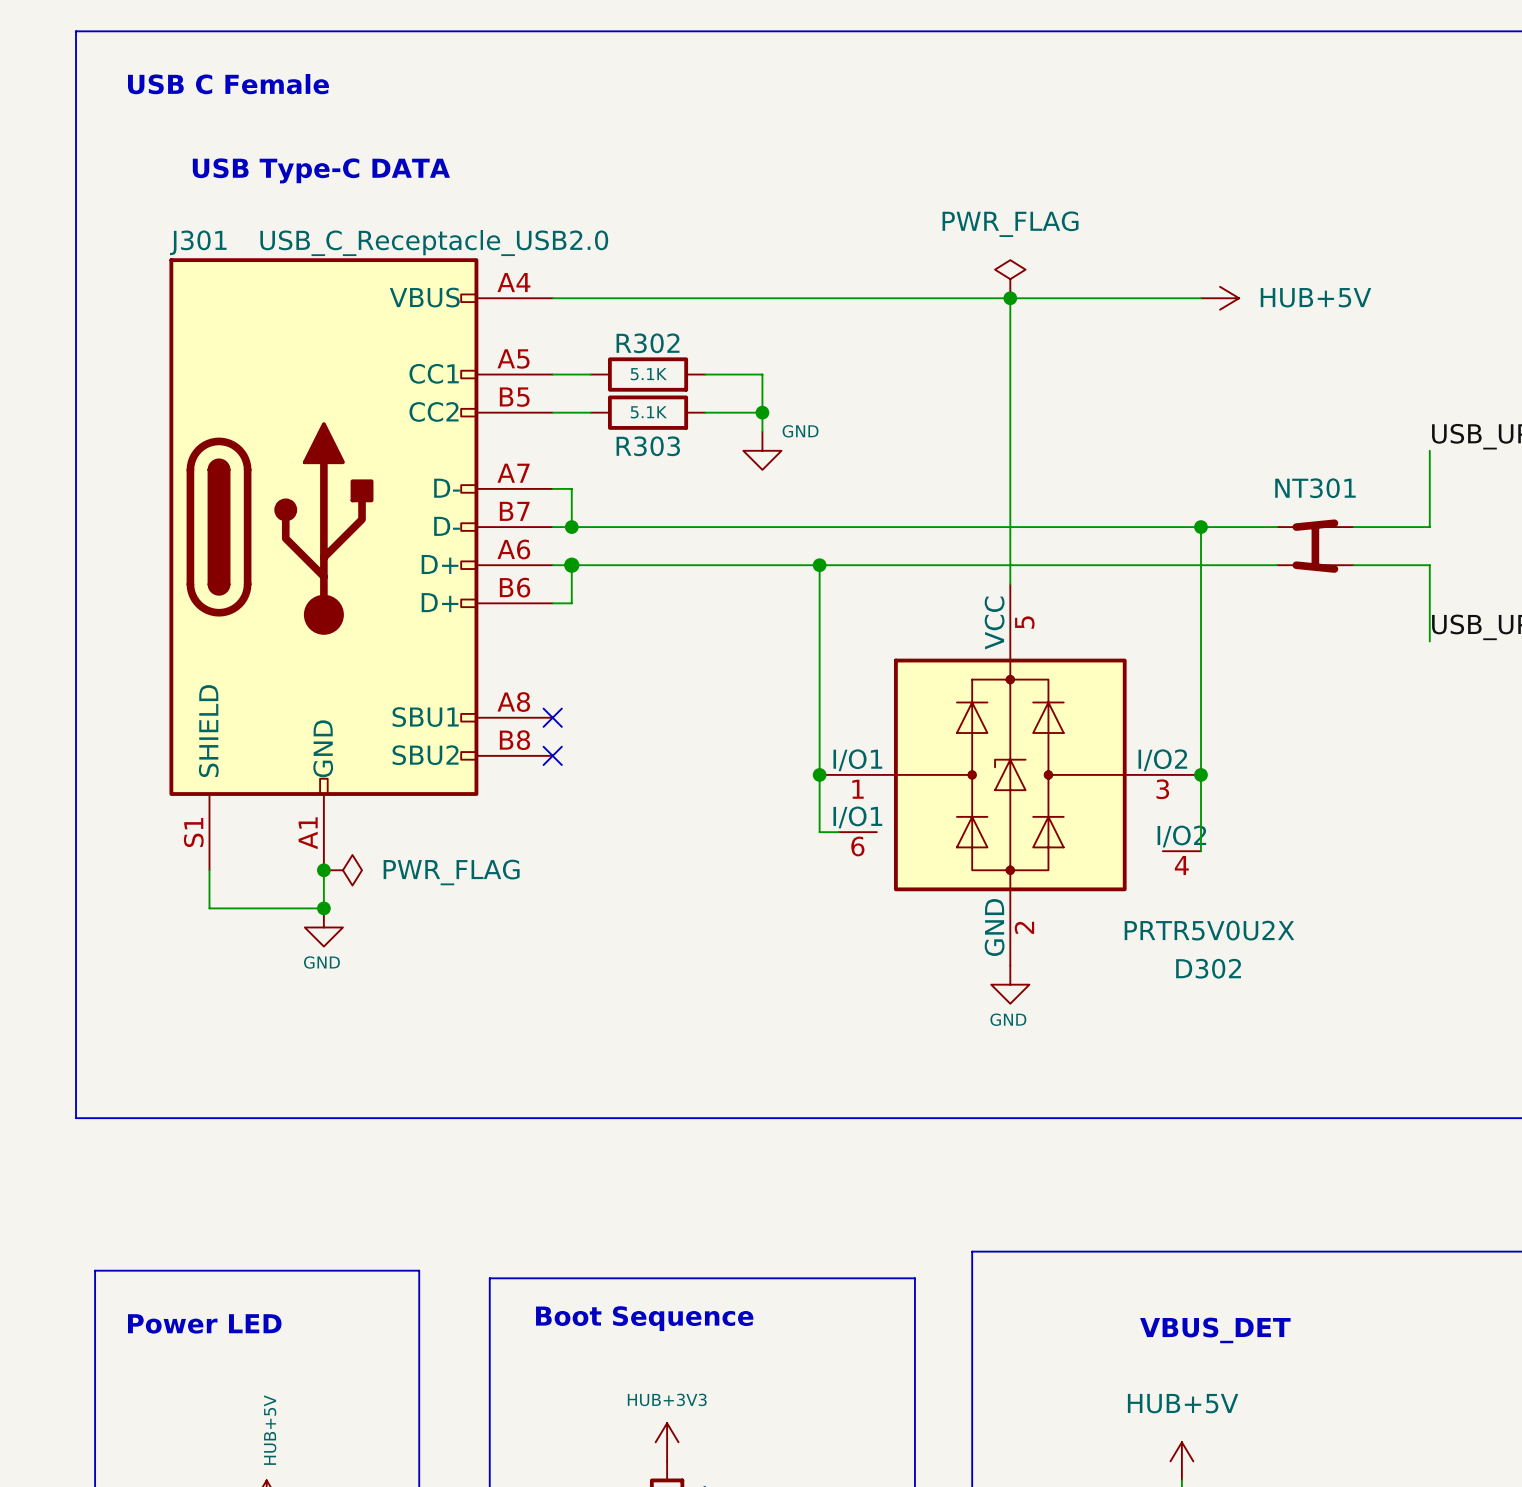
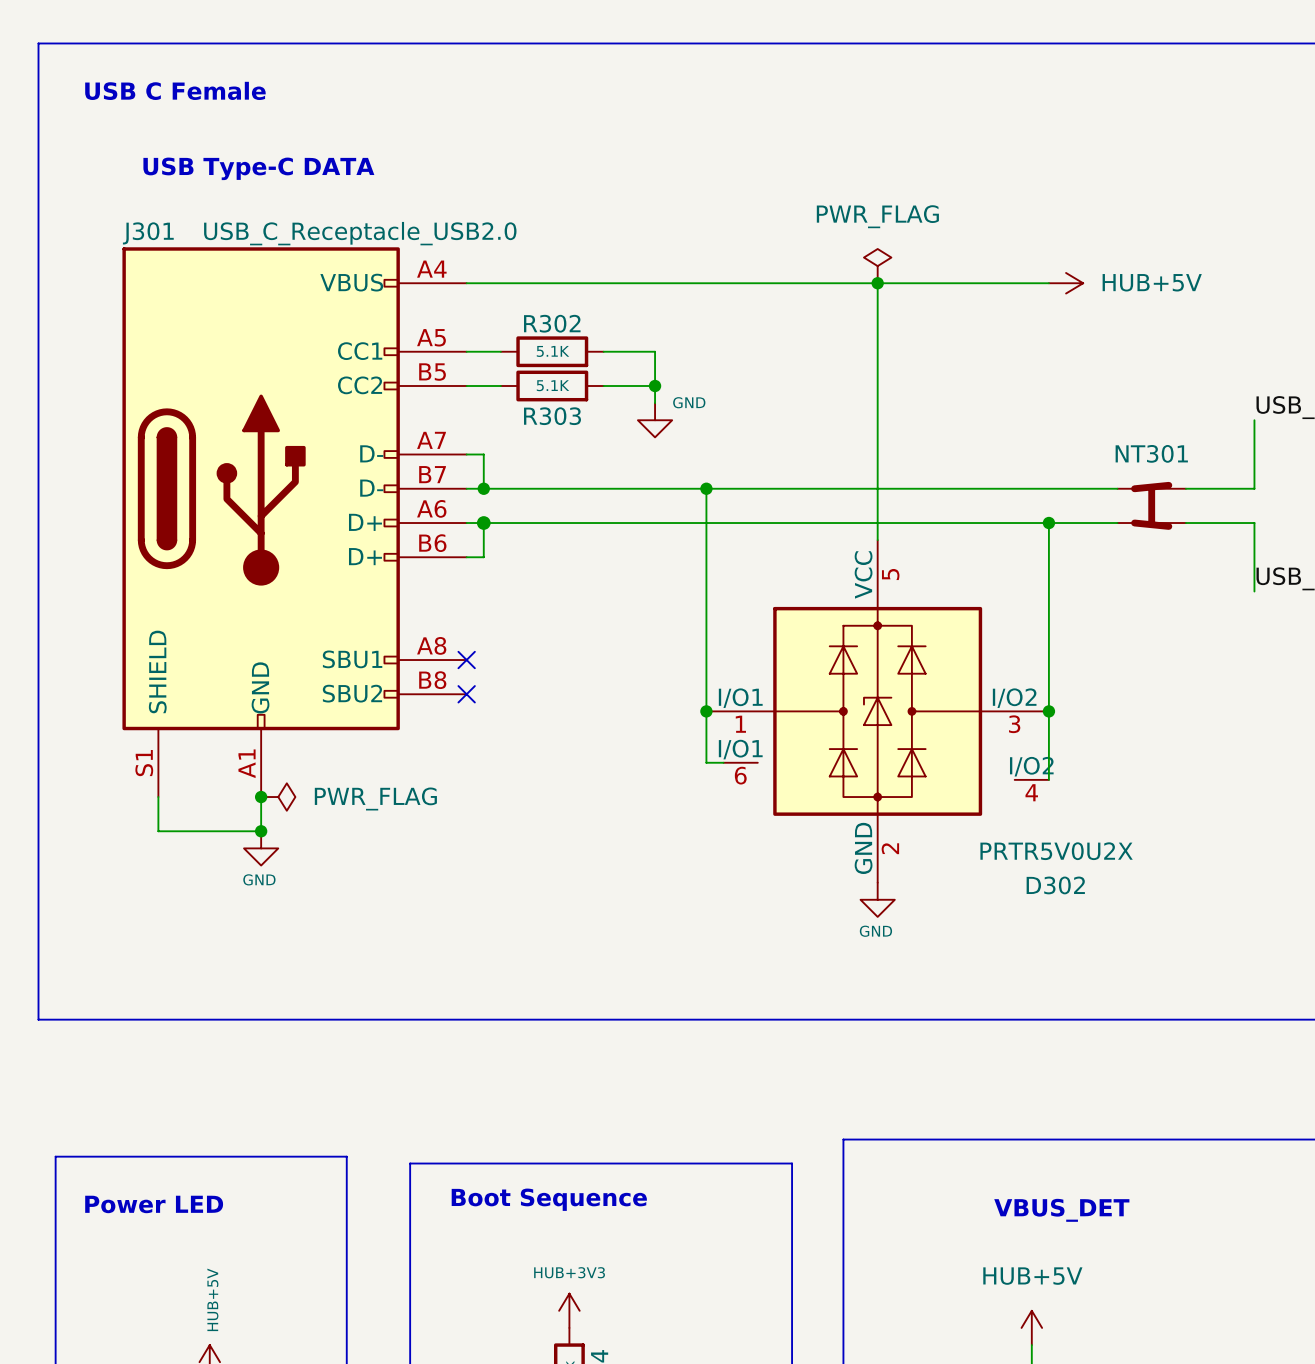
wire: none -> (706, 488) (706, 523)
wire: (1200, 527) (1200, 565) -> none
junction position: (1200, 527) -> (1048, 523)
junction position: (819, 565) -> (706, 488)

